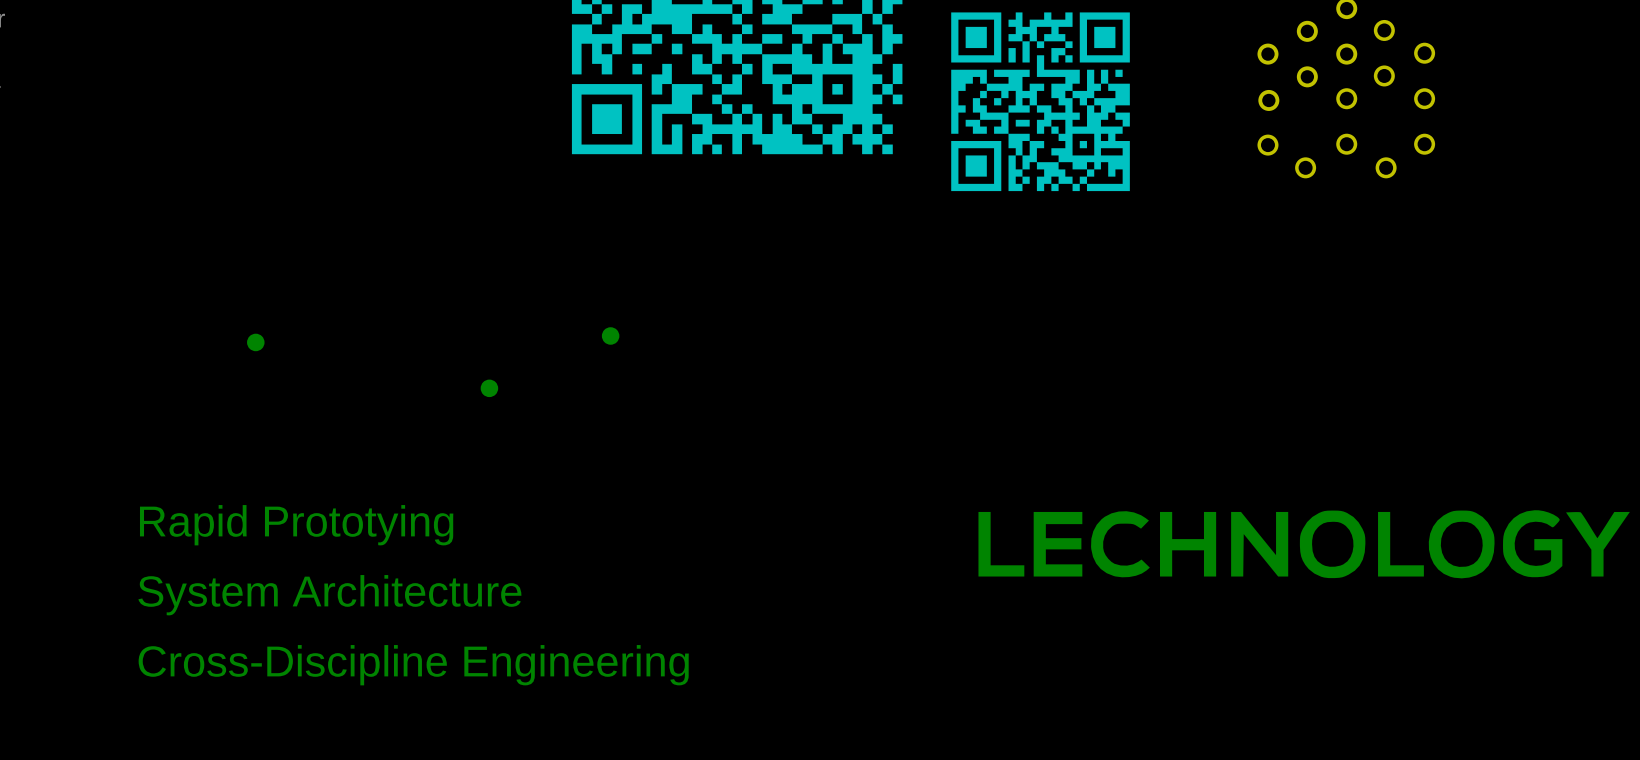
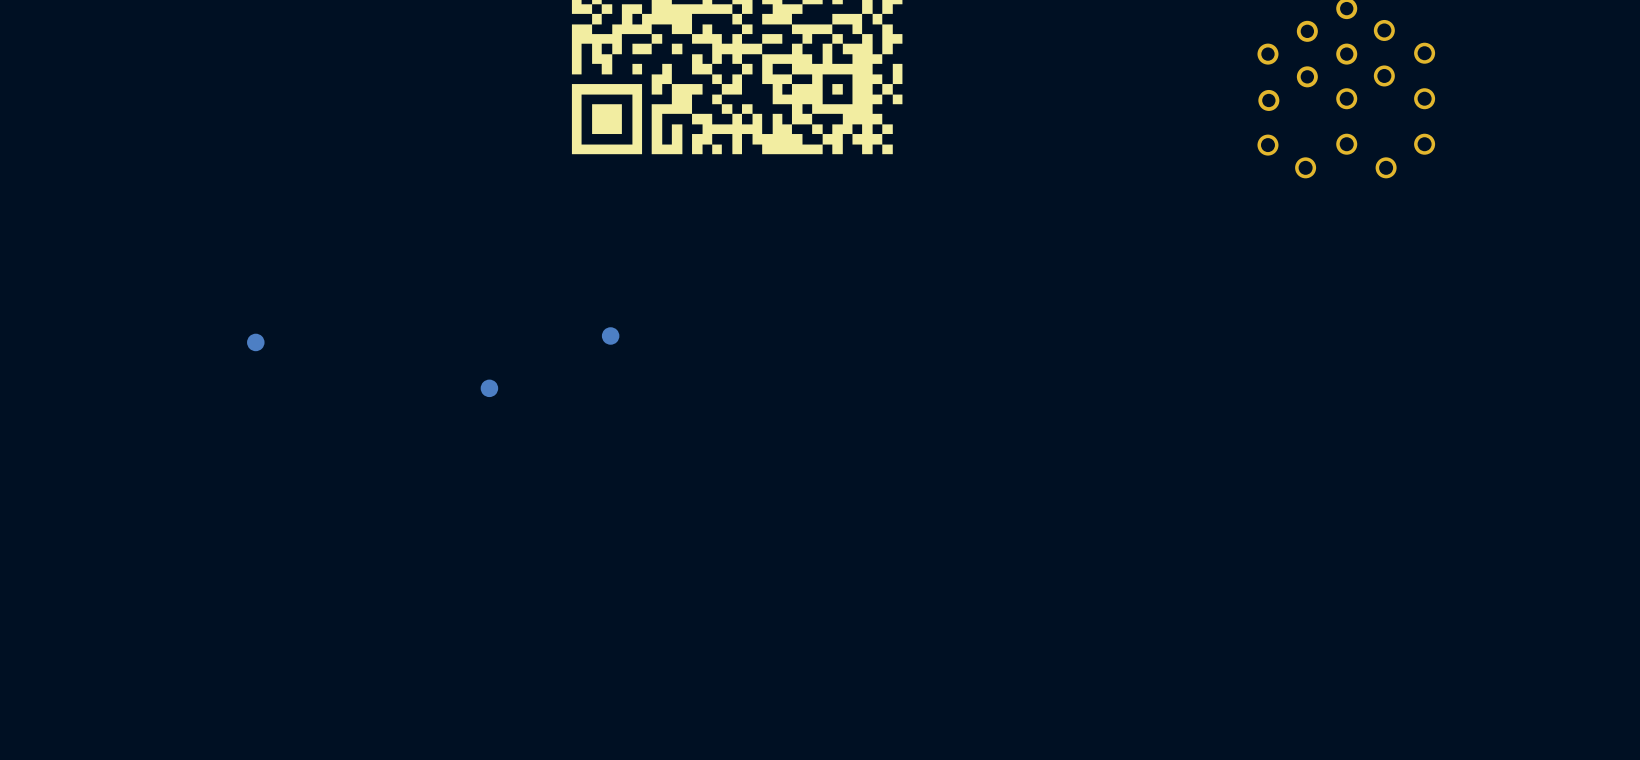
drawing: [951, 12, 1130, 192] -> none
drawing: [978, 510, 1630, 579] -> none
text: Rapid Prototying (296, 525) -> none
text: System Architecture (329, 595) -> none
text: Cross-Discipline Engineering (413, 665) -> none

